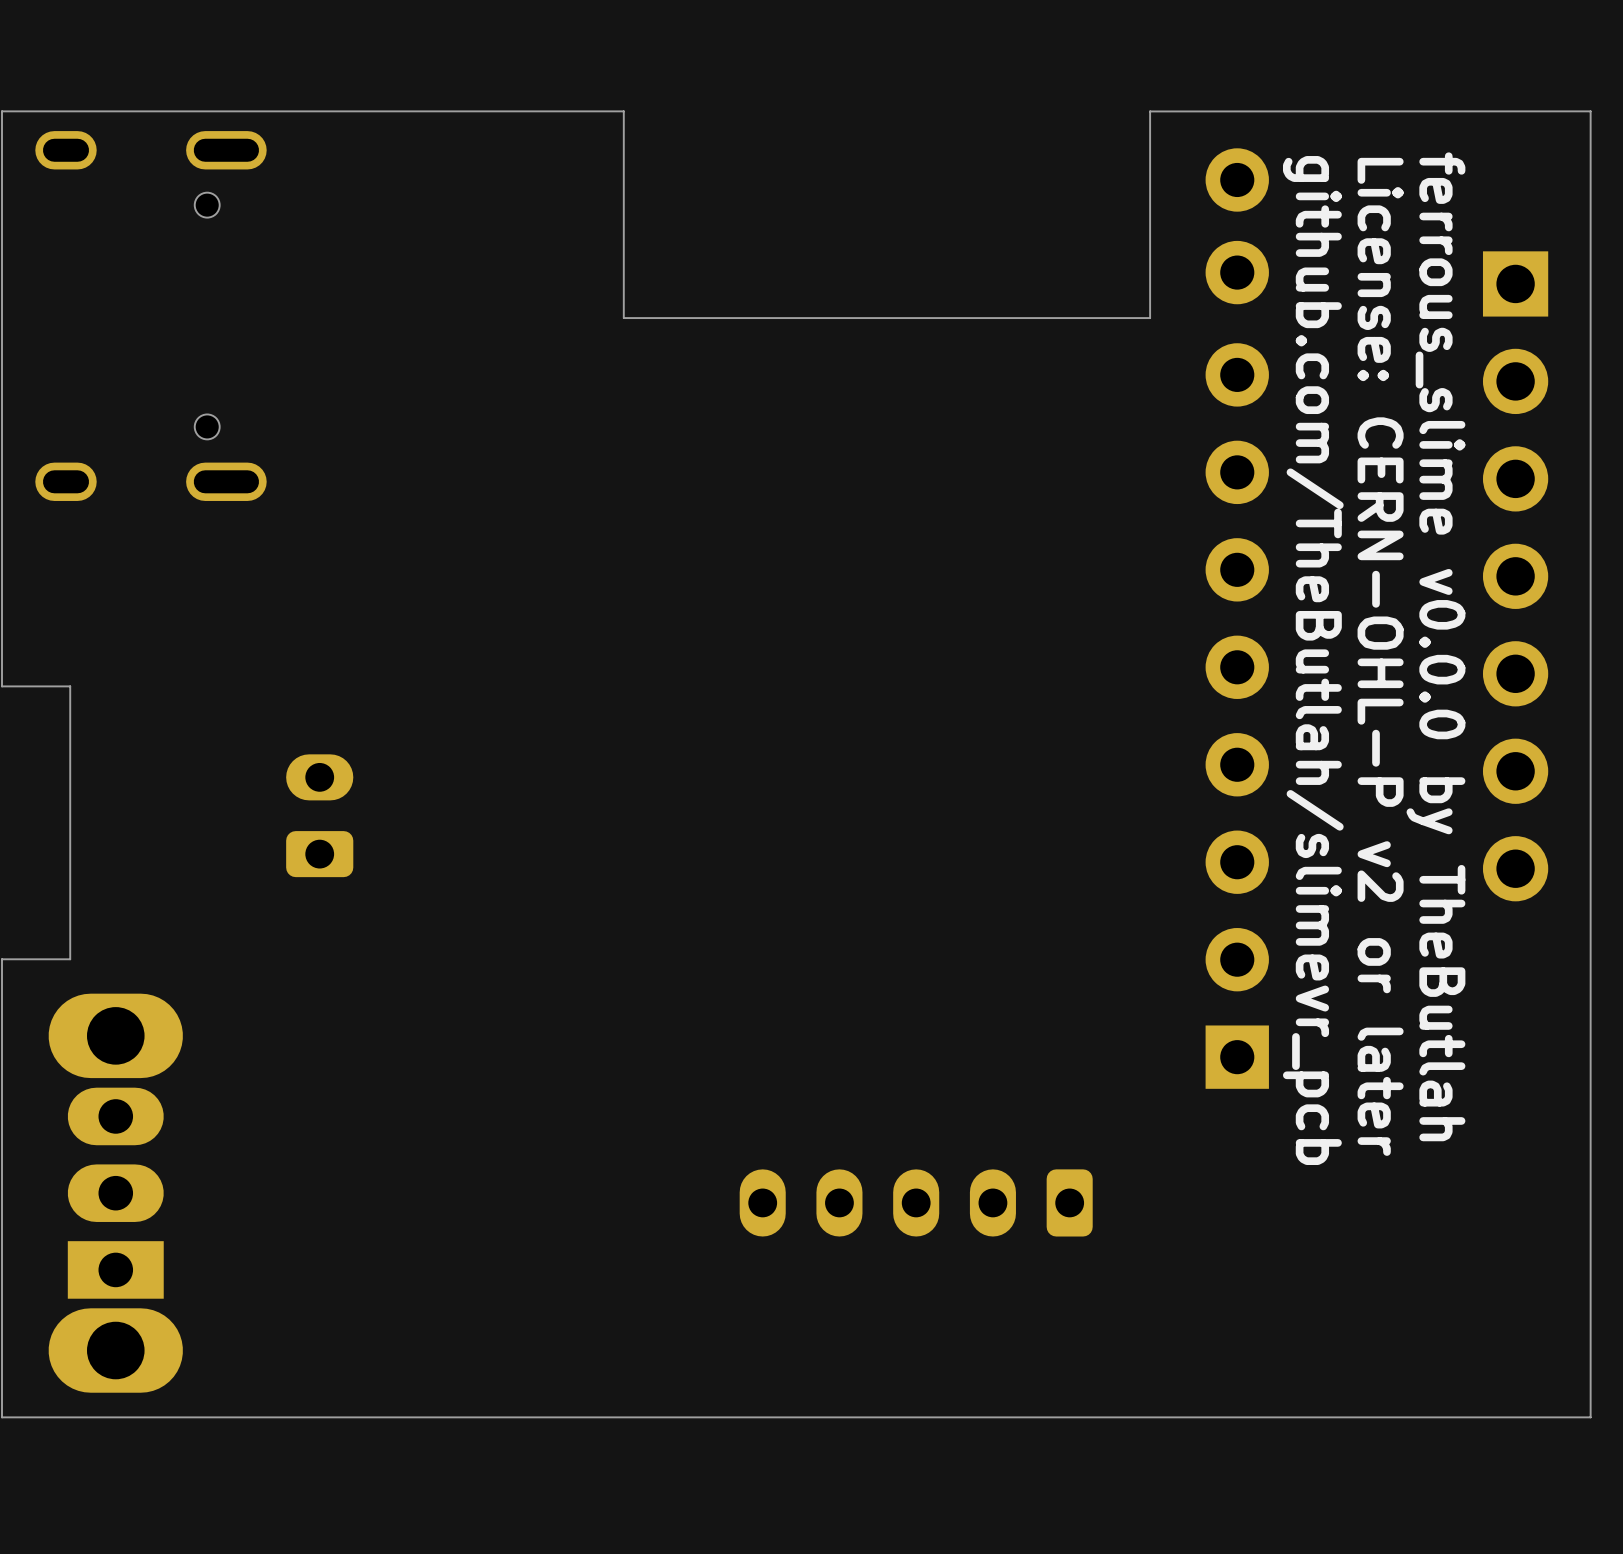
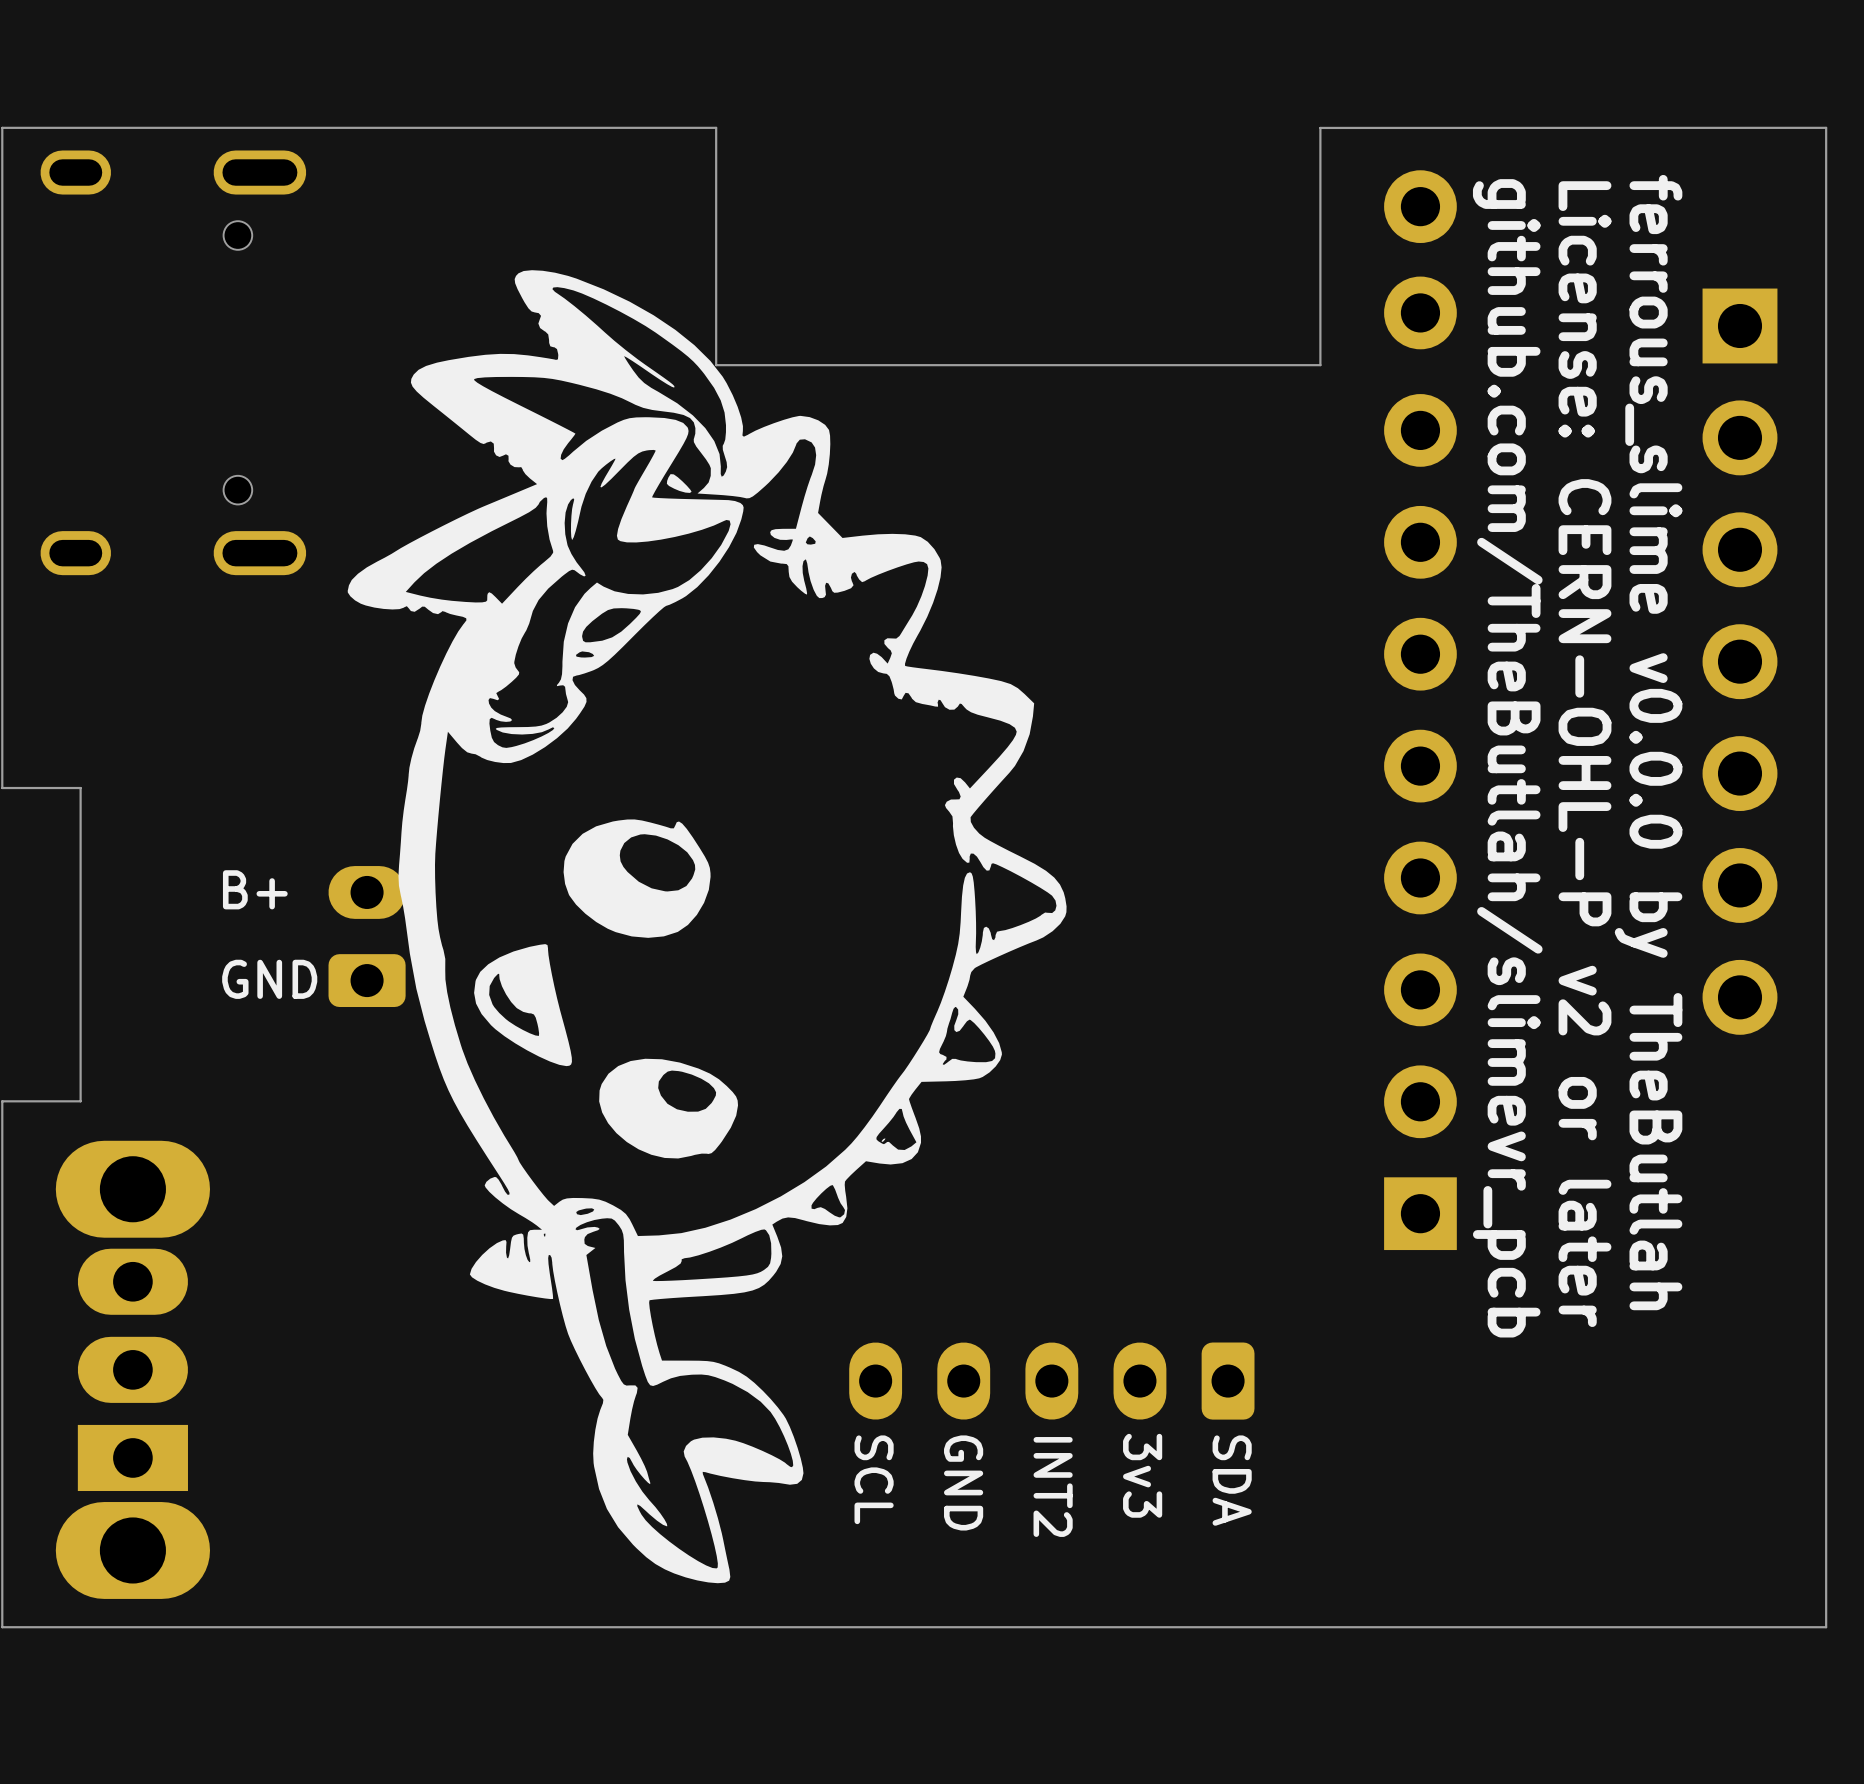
drawing: none -> [347, 270, 1067, 1584]
text: none -> B+ (255, 889)
text: none -> GND (269, 979)
text: none -> 3v3 (1142, 1475)
text: none -> SCL (874, 1479)
text: none -> SDA (1232, 1480)
text: none -> GND (963, 1482)
text: none -> INT2 (1053, 1486)

